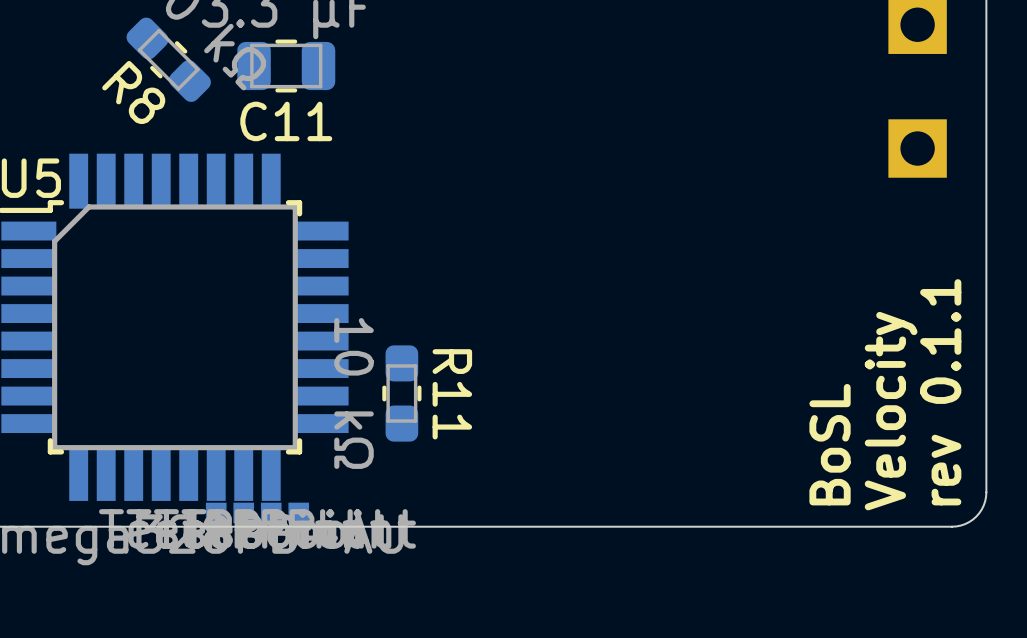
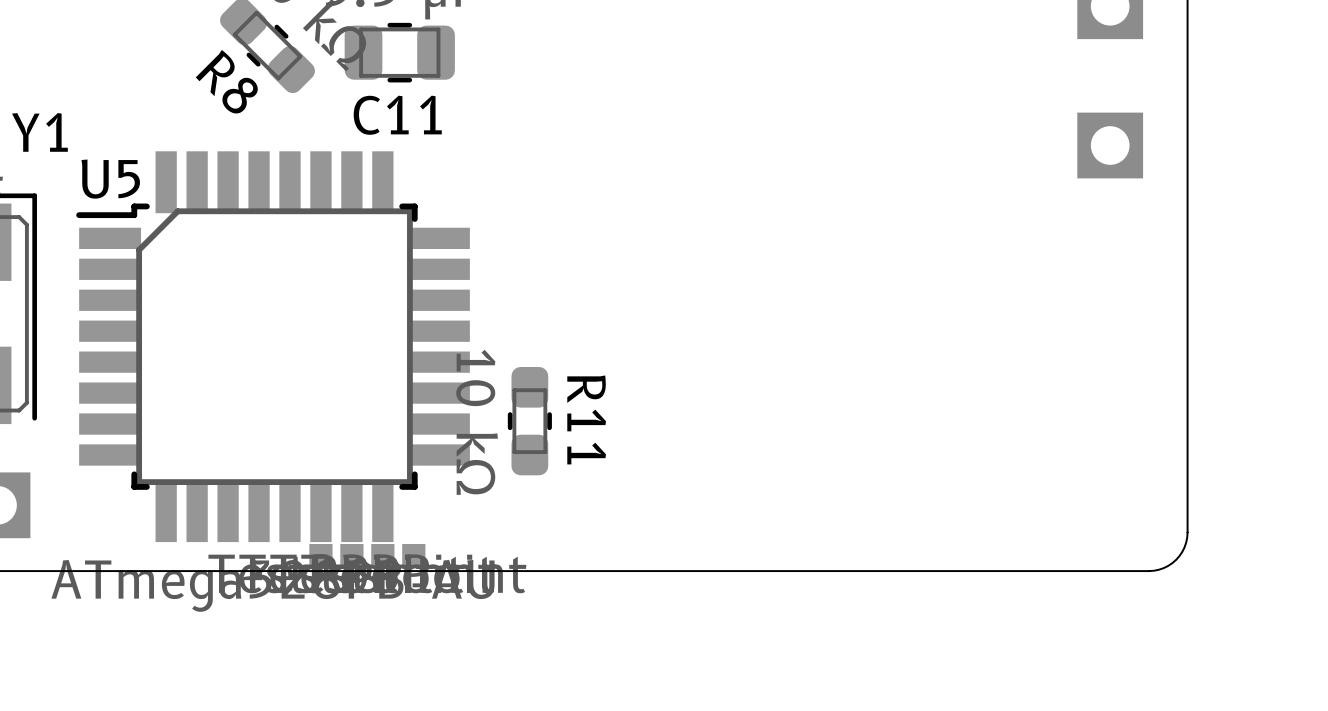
text: rev 0.1.1 (940, 392) -> none
text: Velocity (891, 411) -> none
text: BoSL (830, 444) -> none

